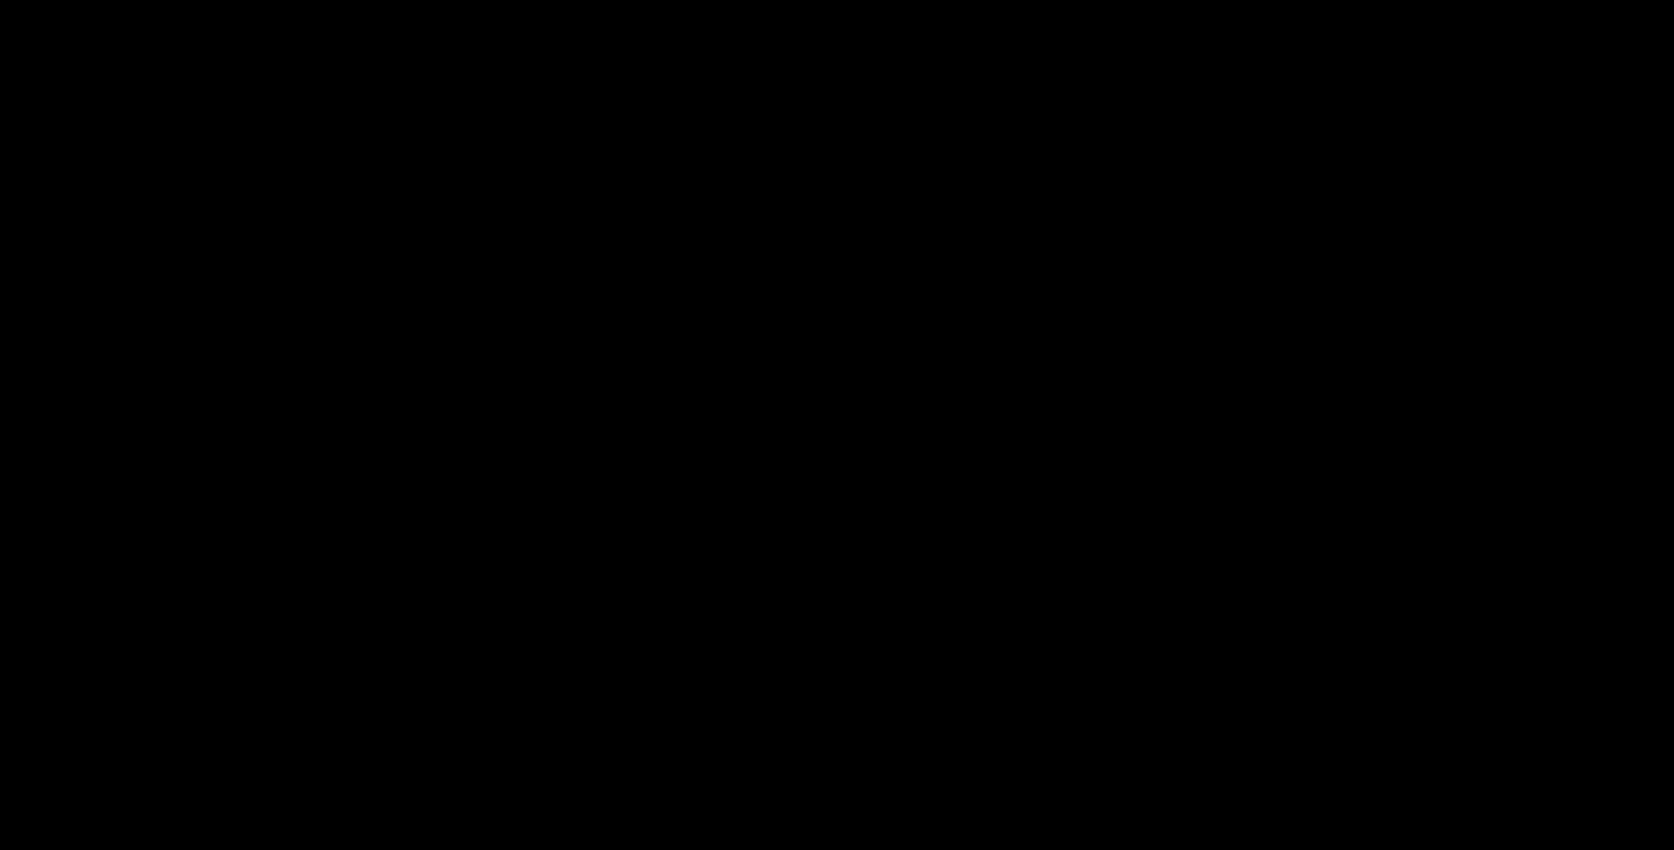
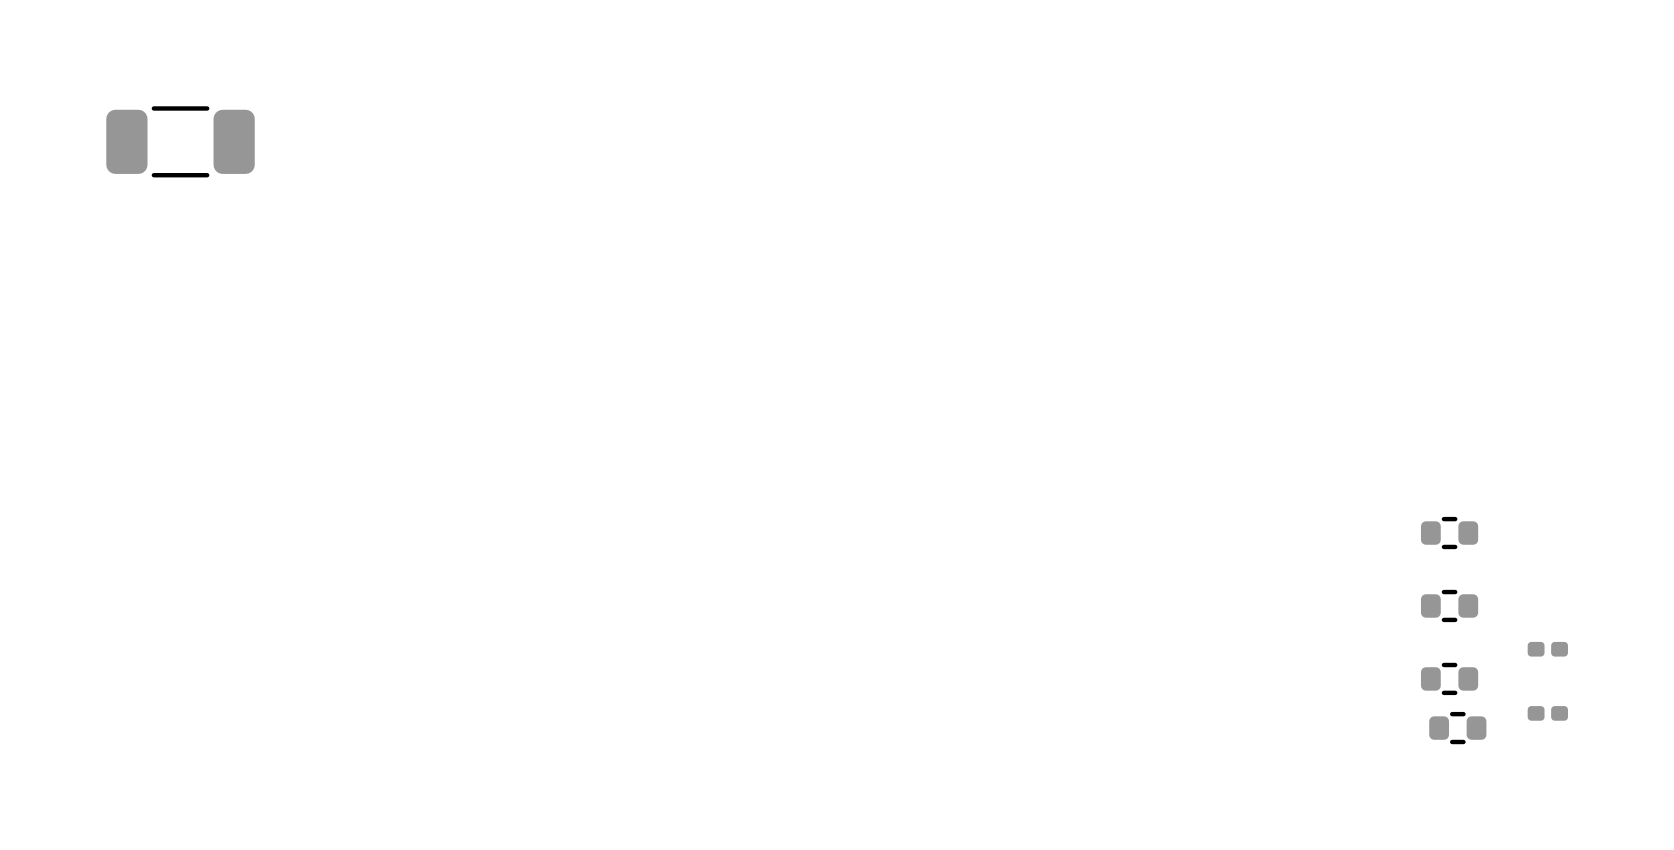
part: none -> (180, 141)
part: none -> (1449, 533)
part: none -> (1449, 605)
part: none -> (1547, 649)
part: none -> (1449, 678)
part: none -> (1547, 713)
part: none -> (1457, 728)

